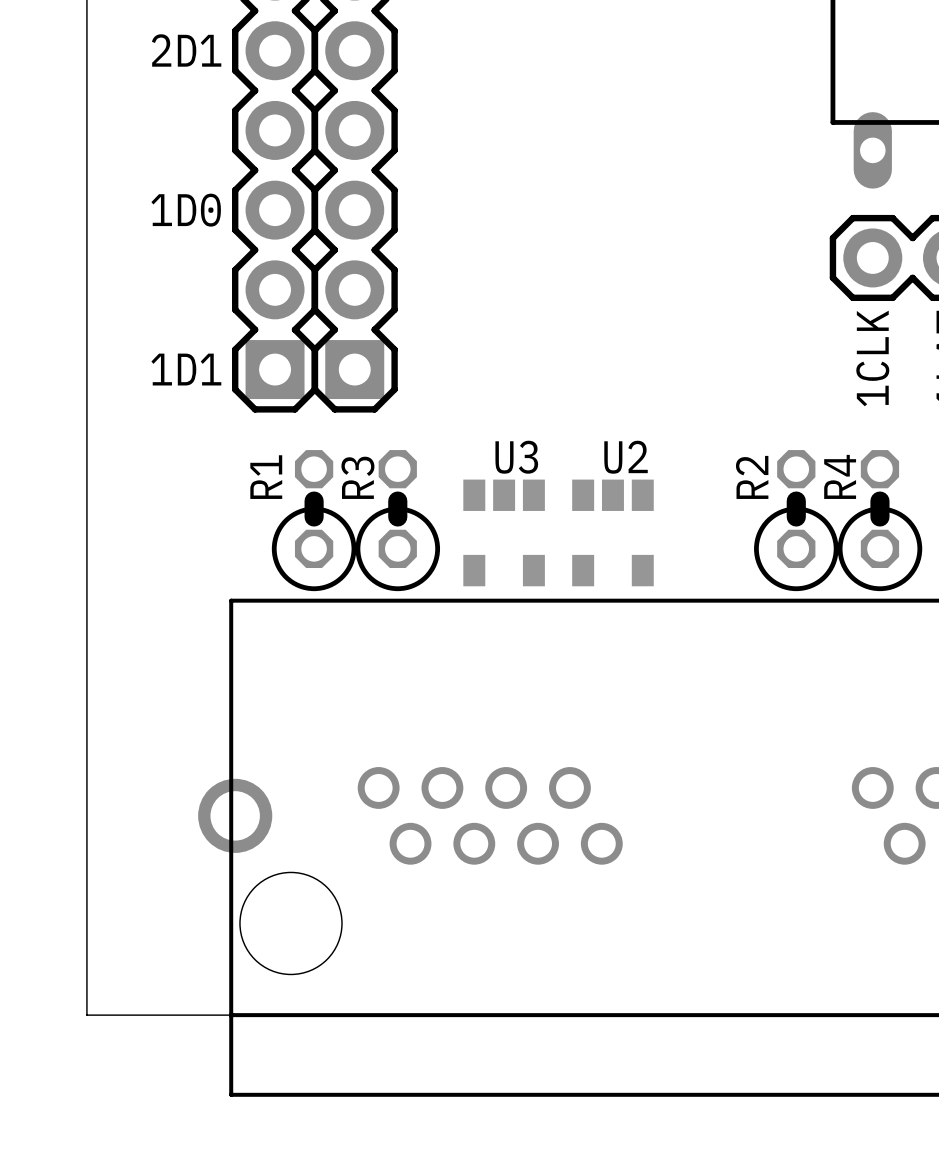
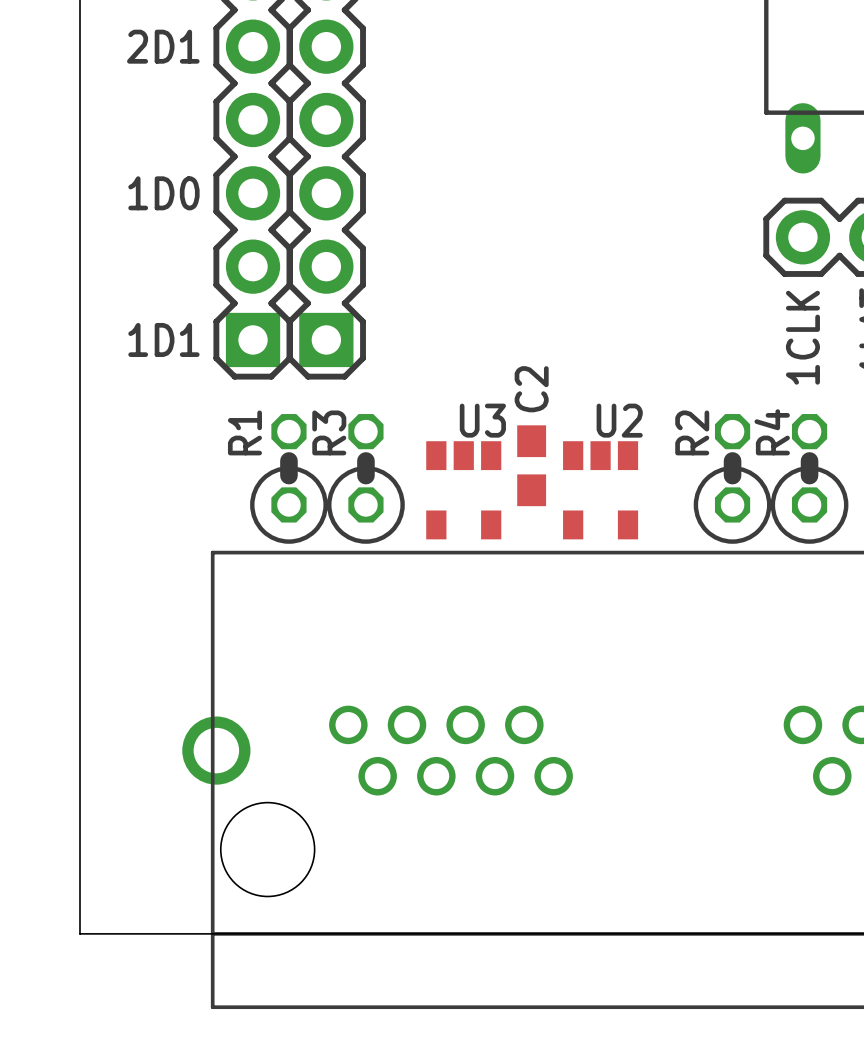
C2: none -> (531, 465)
U2 position: (612, 532) -> (600, 490)

